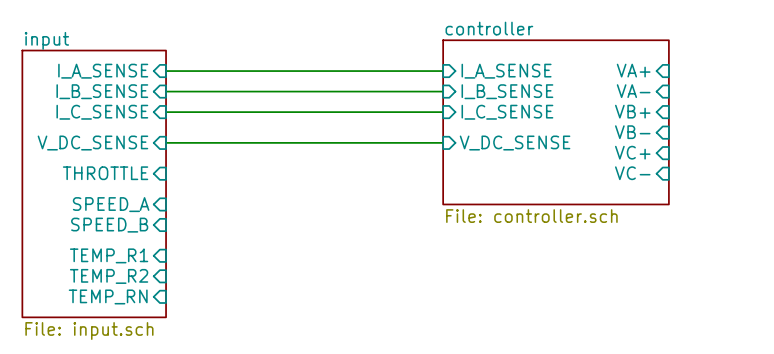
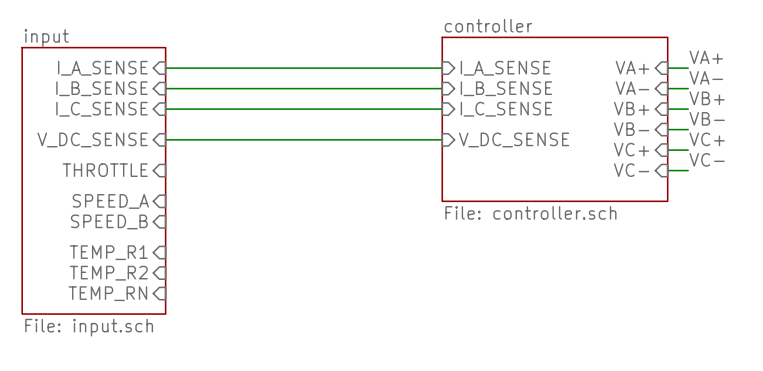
label: none -> VA+ (706, 57)
wire: none -> (667, 68) (688, 68)
label: none -> VA- (706, 77)
wire: none -> (667, 88) (688, 88)
label: none -> VB+ (707, 98)
wire: none -> (667, 109) (688, 109)
label: none -> VB- (707, 118)
wire: none -> (667, 129) (688, 129)
label: none -> VC+ (707, 139)
wire: none -> (667, 150) (688, 150)
label: none -> VC- (707, 159)
wire: none -> (667, 170) (688, 170)

